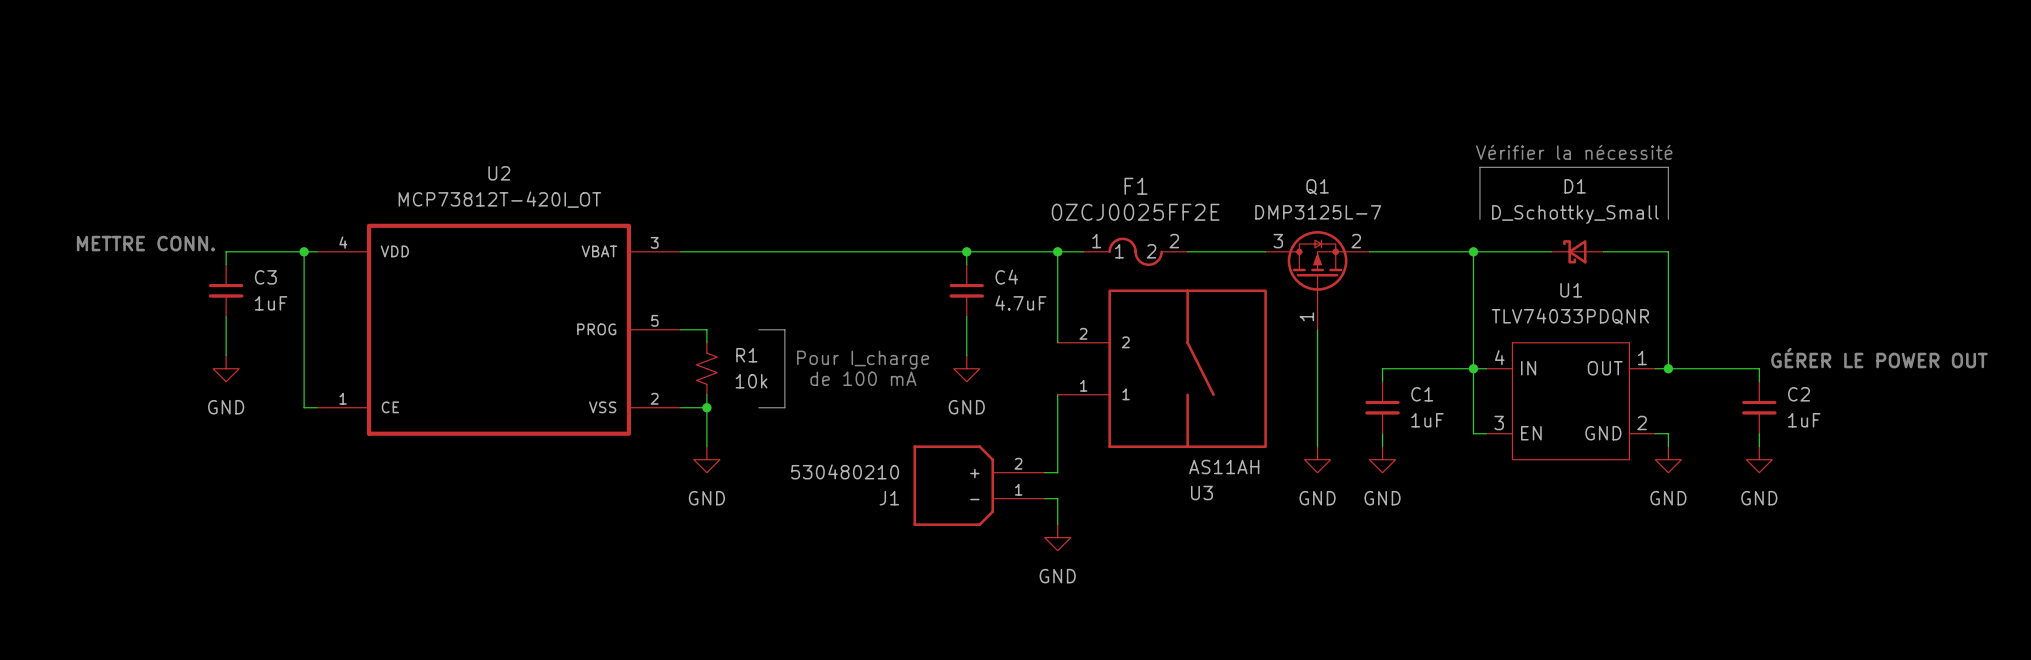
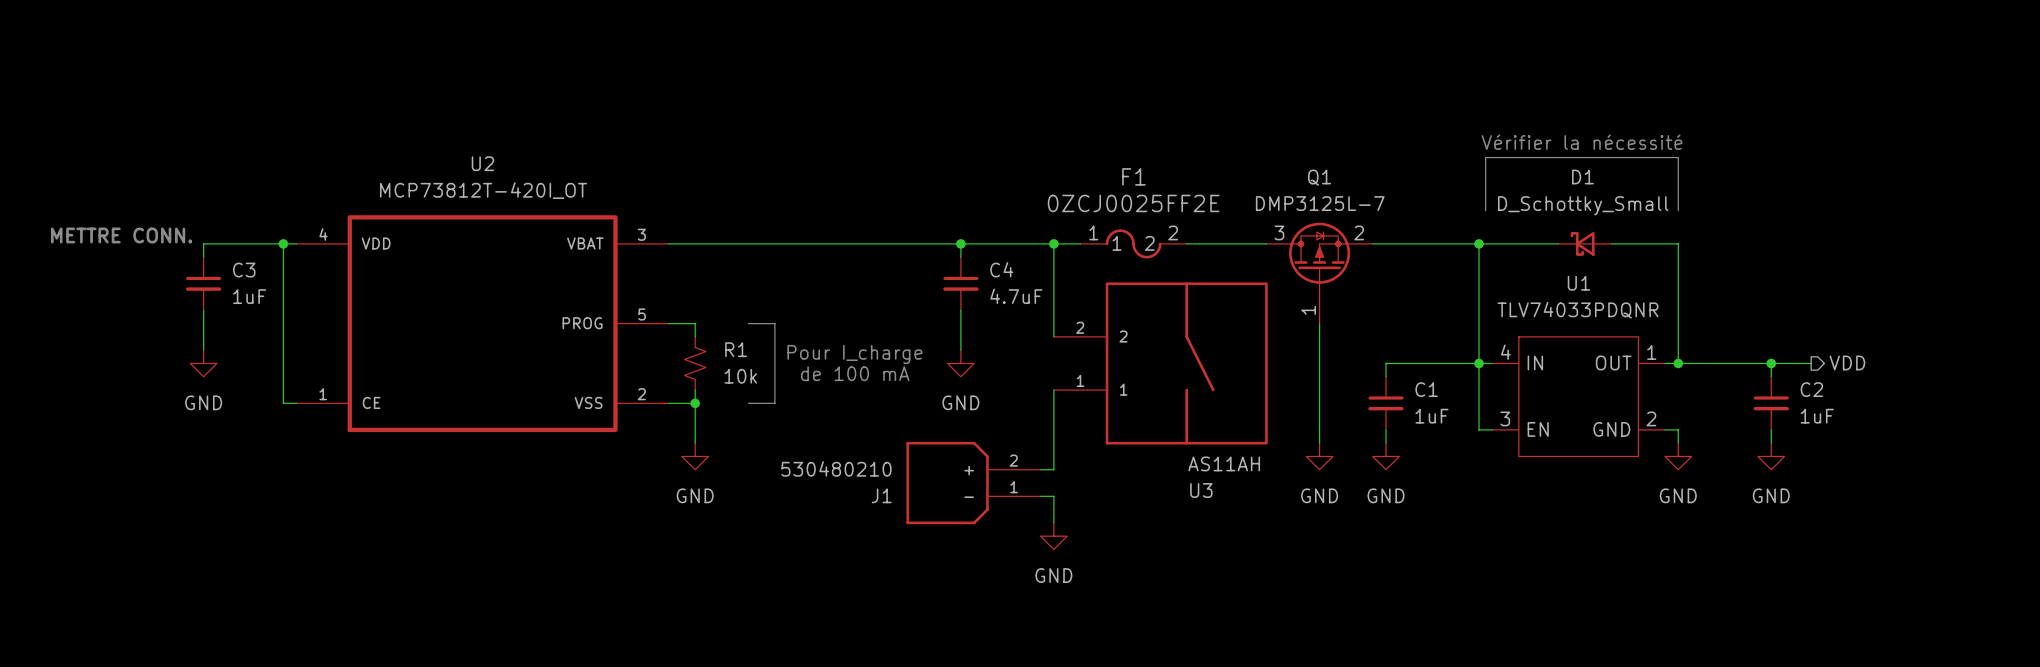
text: GÉRER LE POWER OUT (1879, 358) -> none
wire: none -> (1771, 363) (1811, 363)
junction: none -> (1771, 363)
hierarchical label: none -> VDD (1847, 362)

